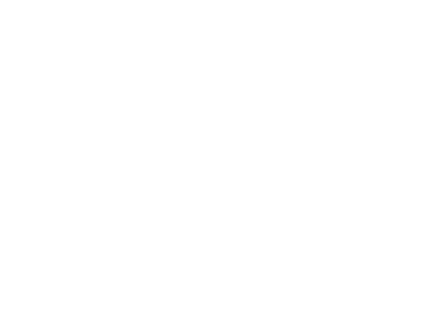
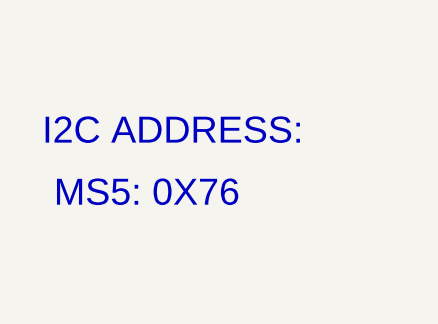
text: none -> I2C ADDRESS: (172, 129)
text: none -> MS5: 0X76 (147, 191)

